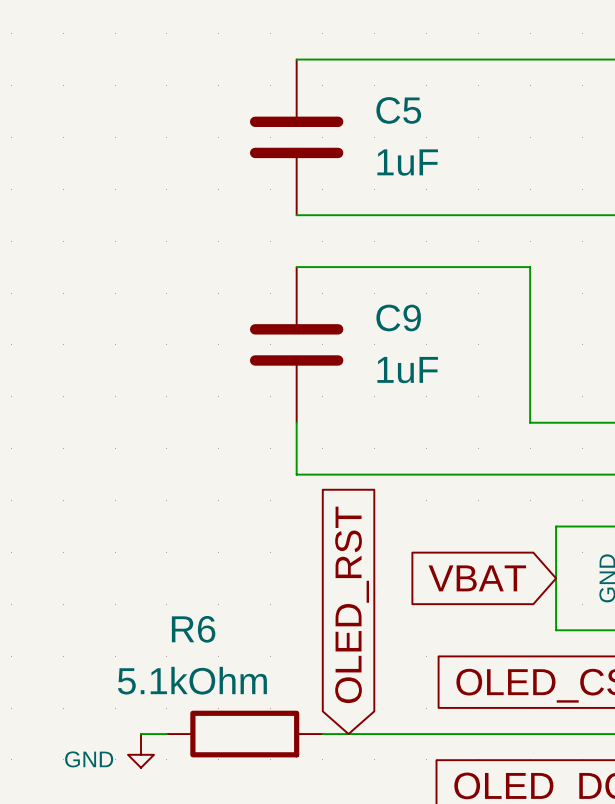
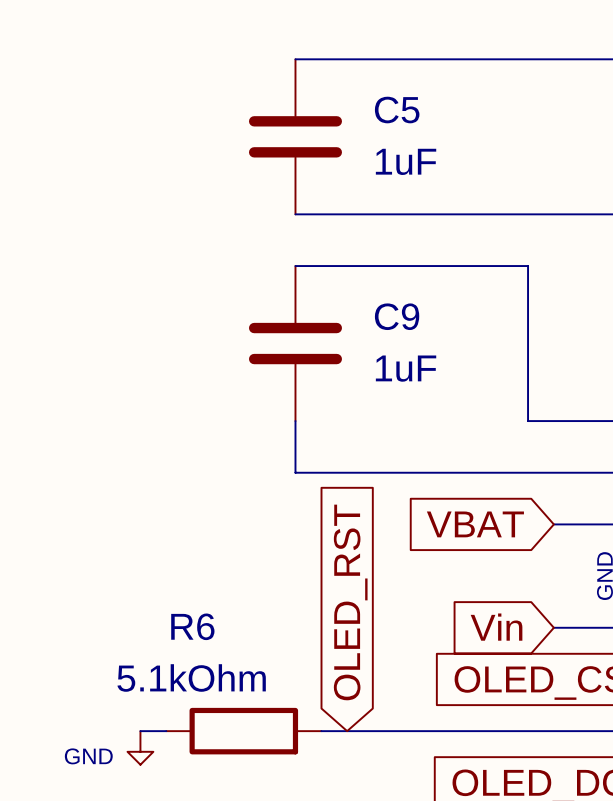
wire: (556, 526) (556, 630) -> none
global label position: VBAT (477, 578) -> VBAT (475, 524)
global label: none -> Vin (496, 627)

